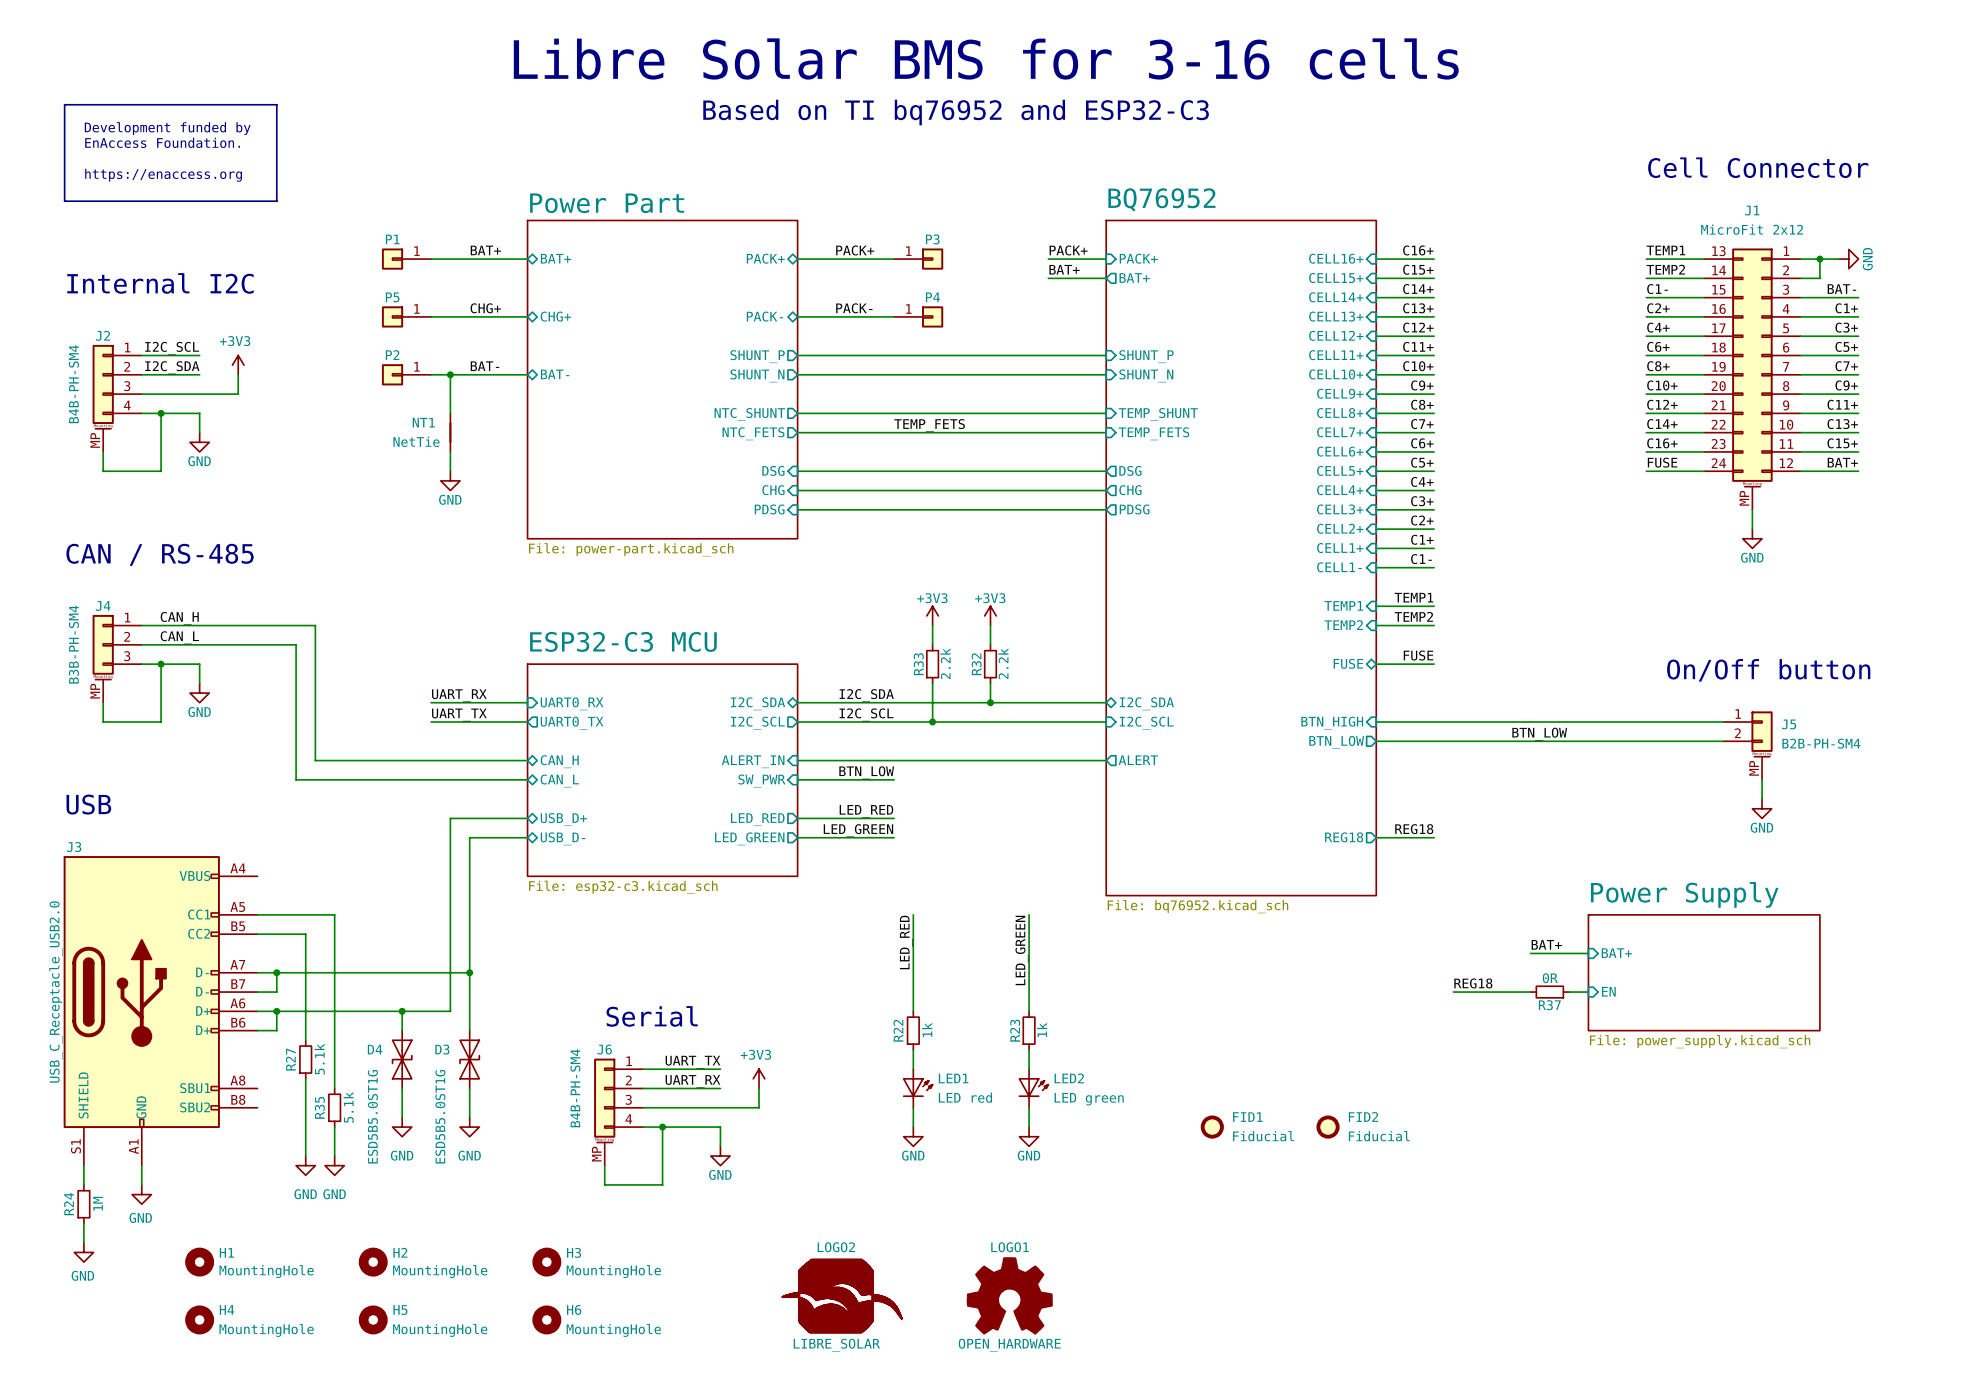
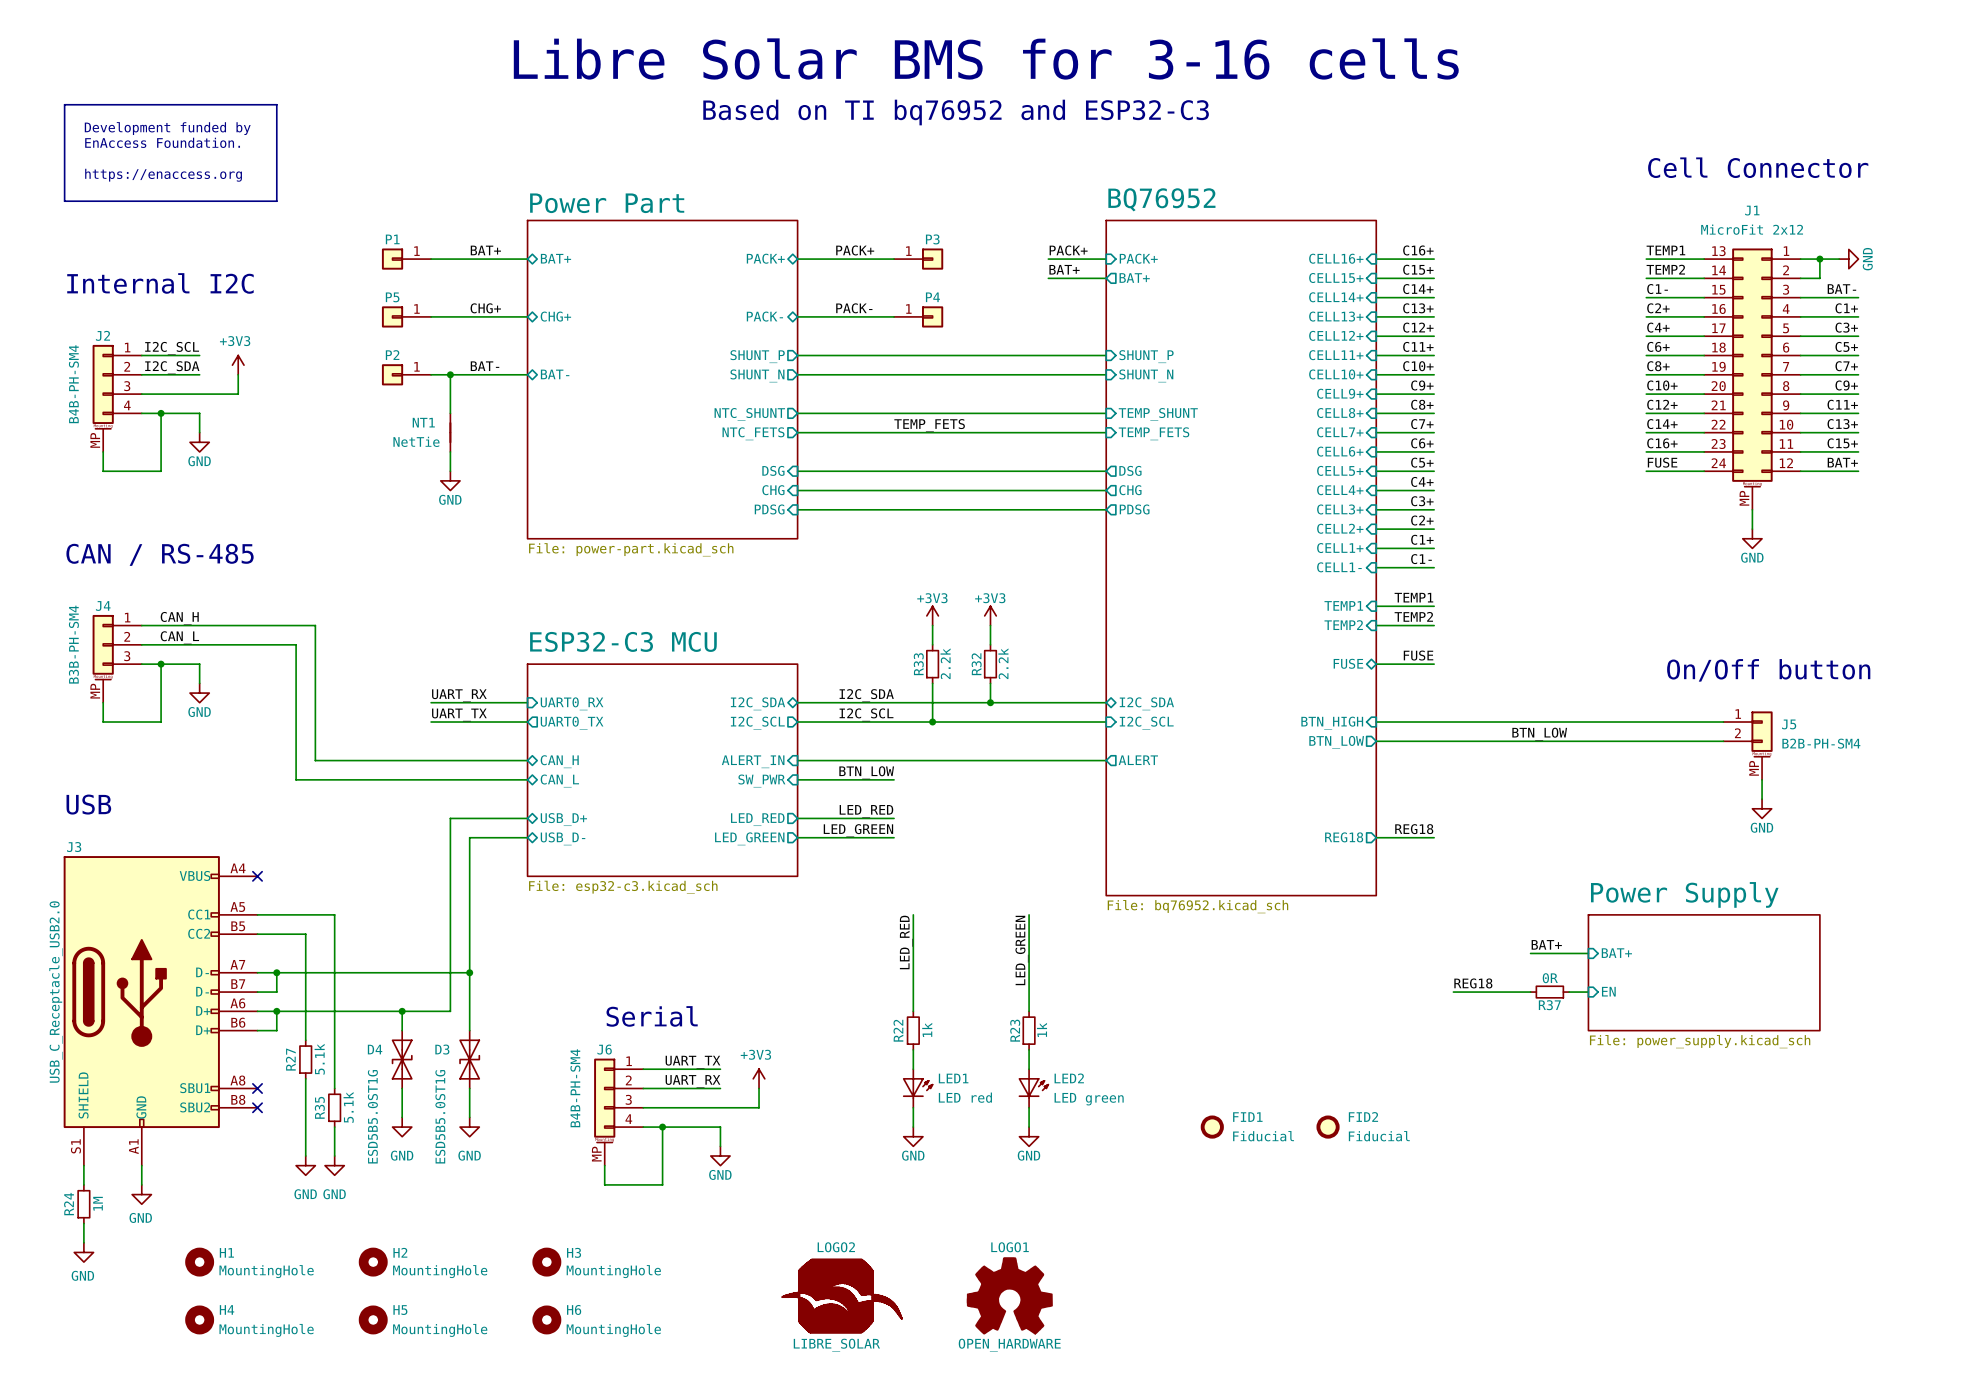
no-connect mark: none -> (257, 876)
no-connect mark: none -> (257, 1088)
no-connect mark: none -> (257, 1107)

